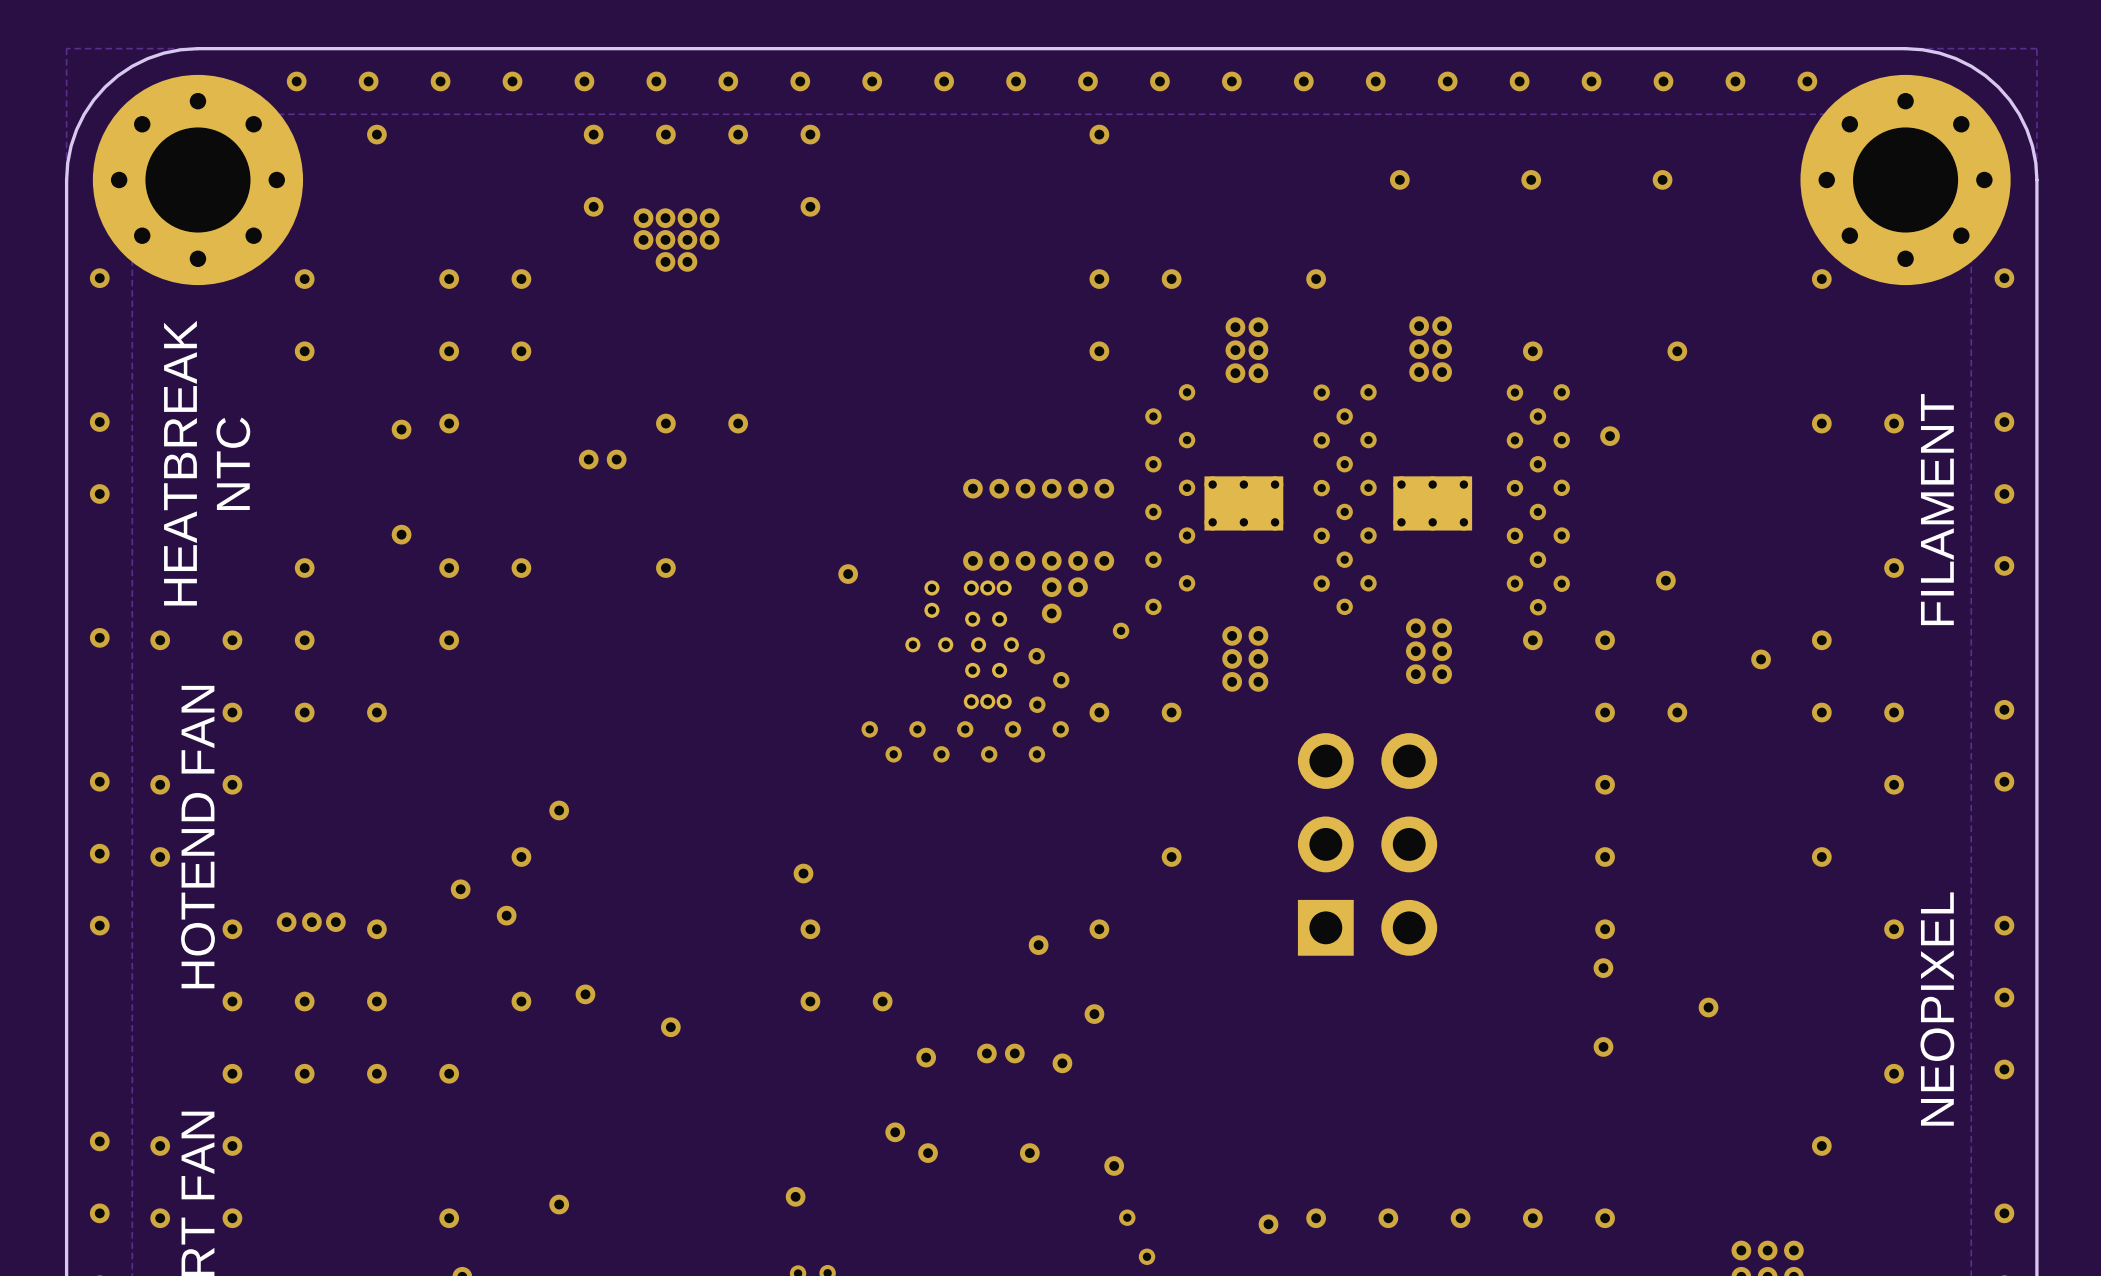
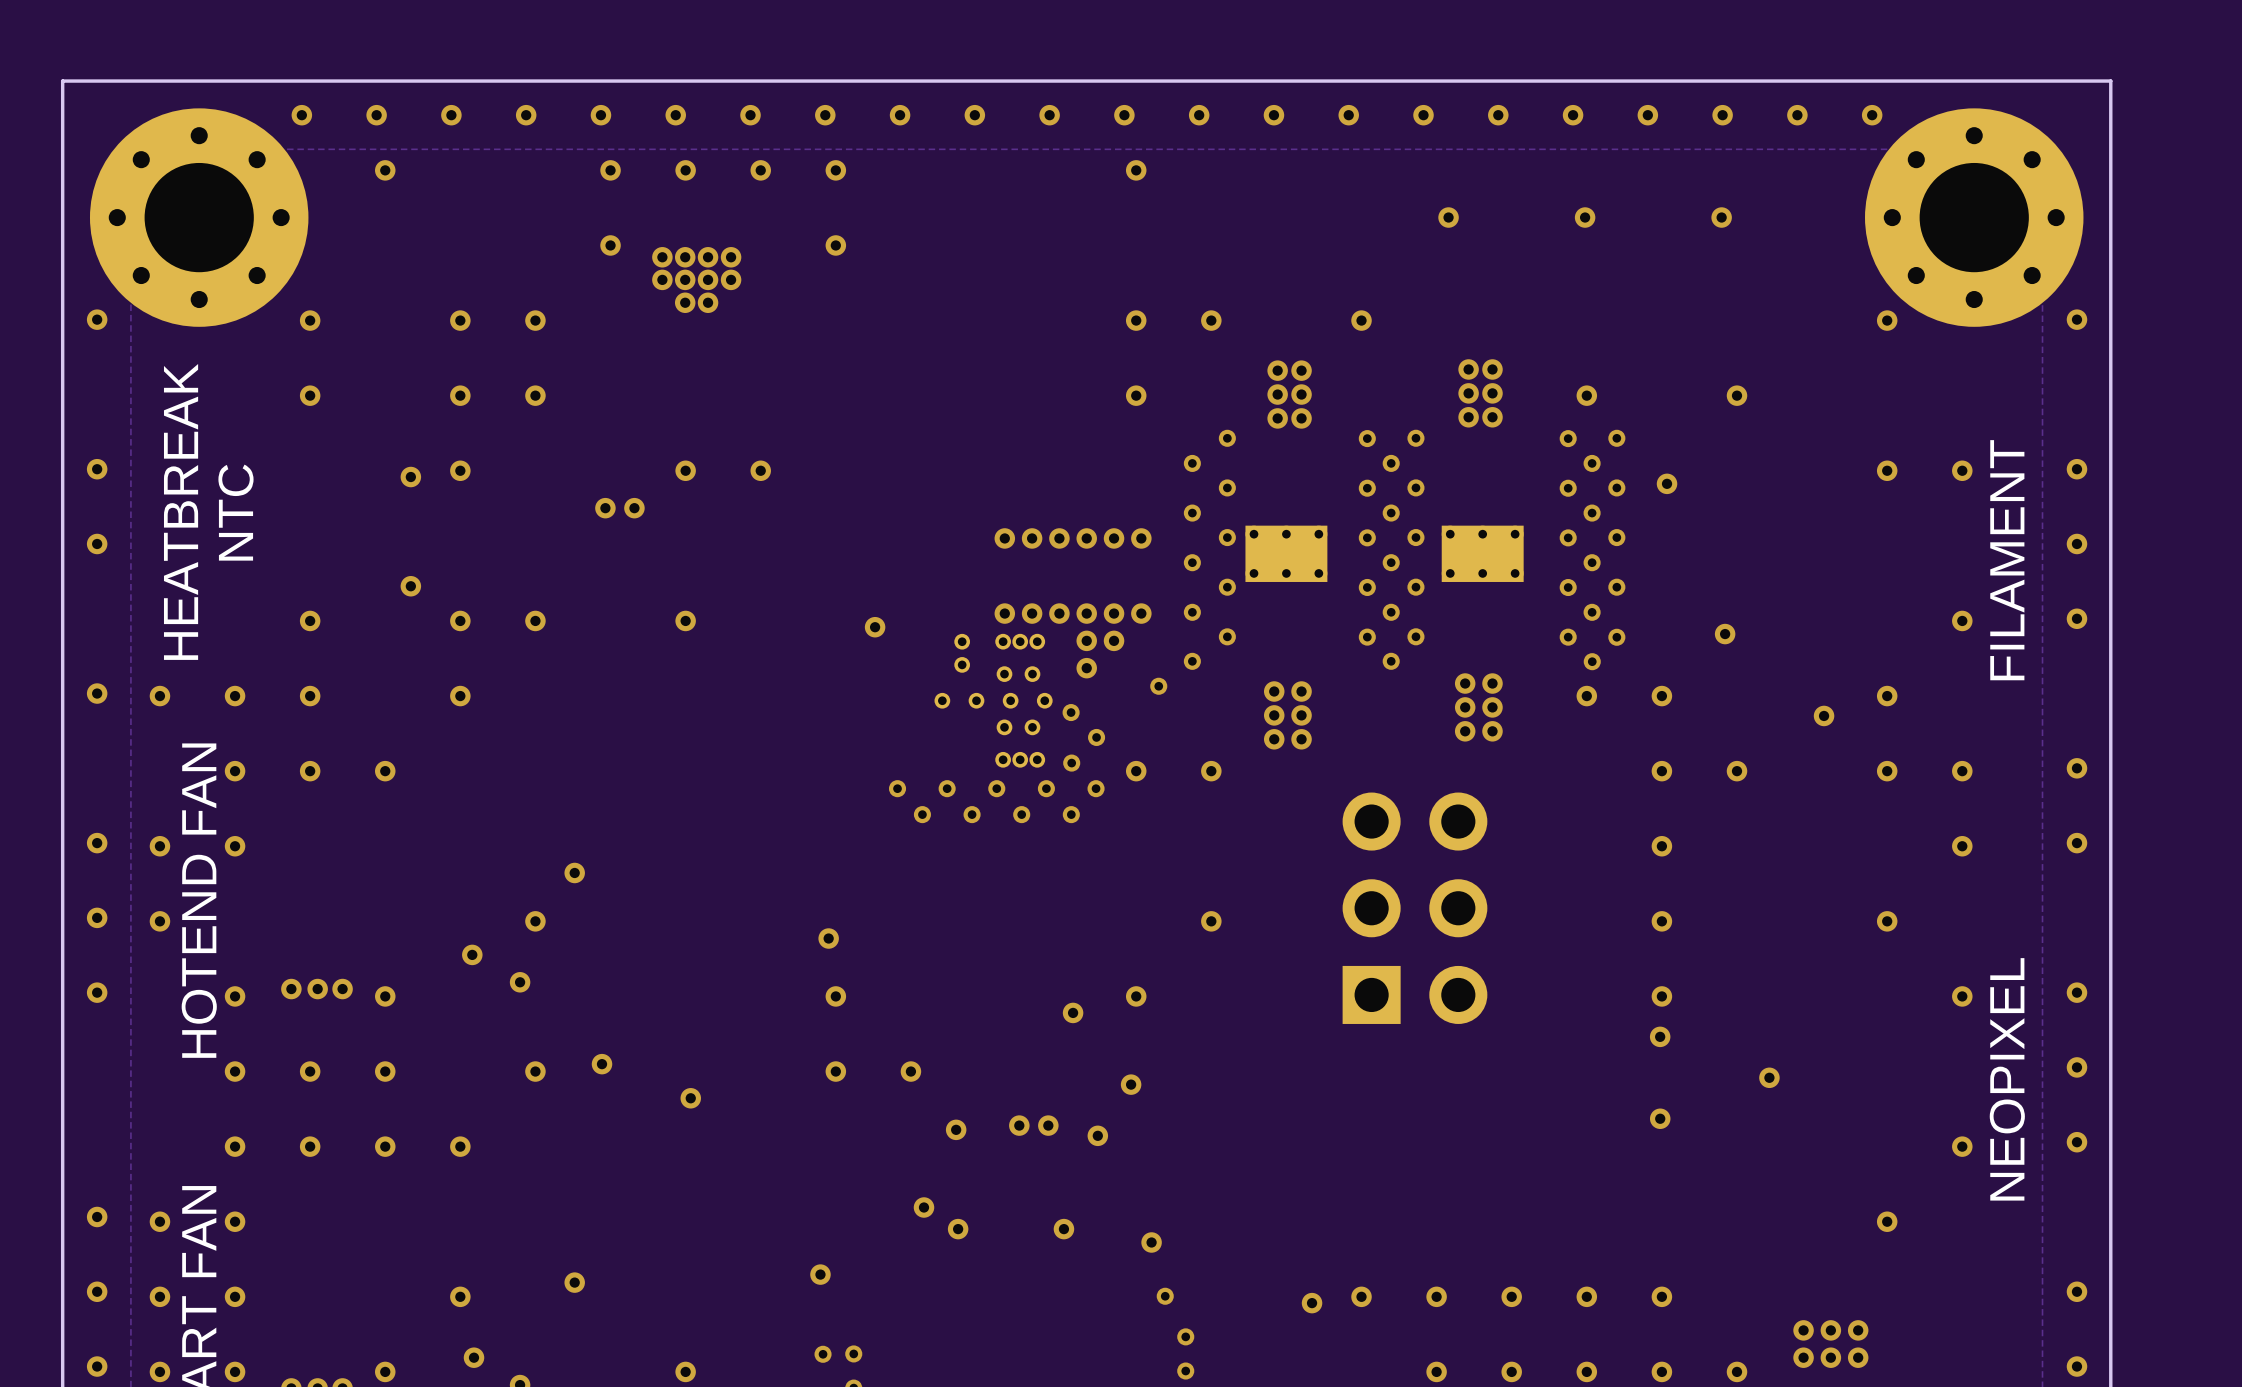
board edge: (197, 48) (163, 53) (147, 58) (132, 66) (105, 87) (93, 100) (76, 129) (71, 145) (66, 179) -> (199, 81) (62, 81) (62, 217)
board edge: (1905, 48) (1922, 49) (1955, 58) (1971, 66) (1998, 87) (2009, 100) (2026, 129) (2035, 162) (2036, 179) -> (1974, 81) (2110, 81) (2110, 217)

